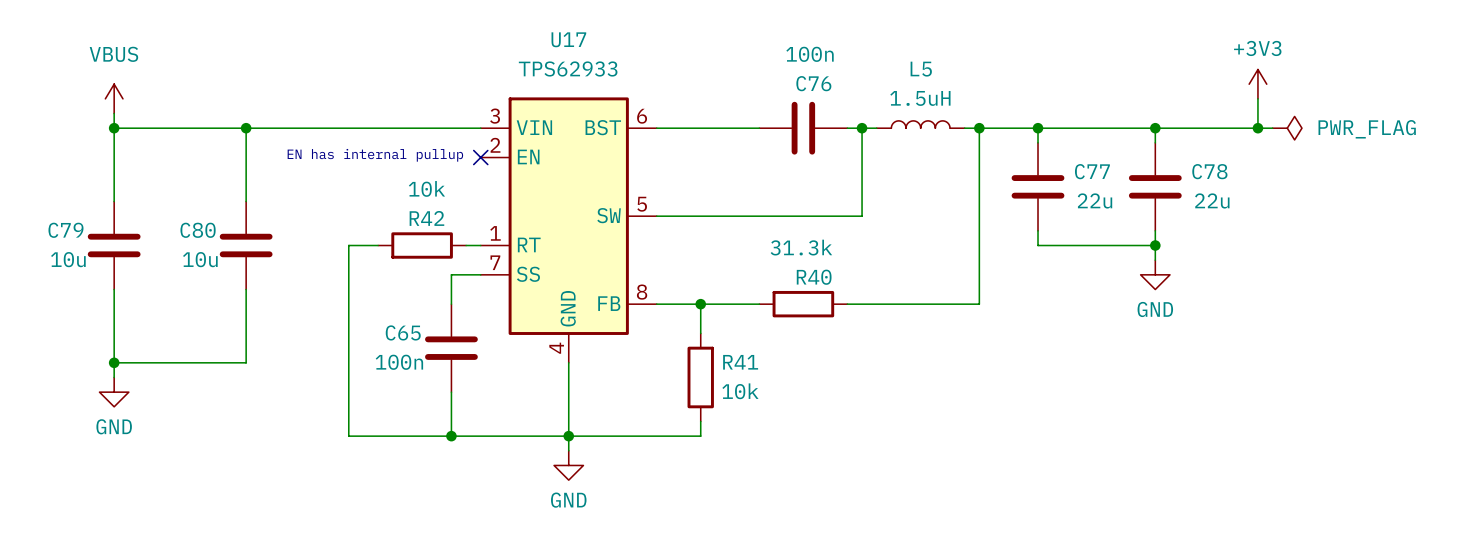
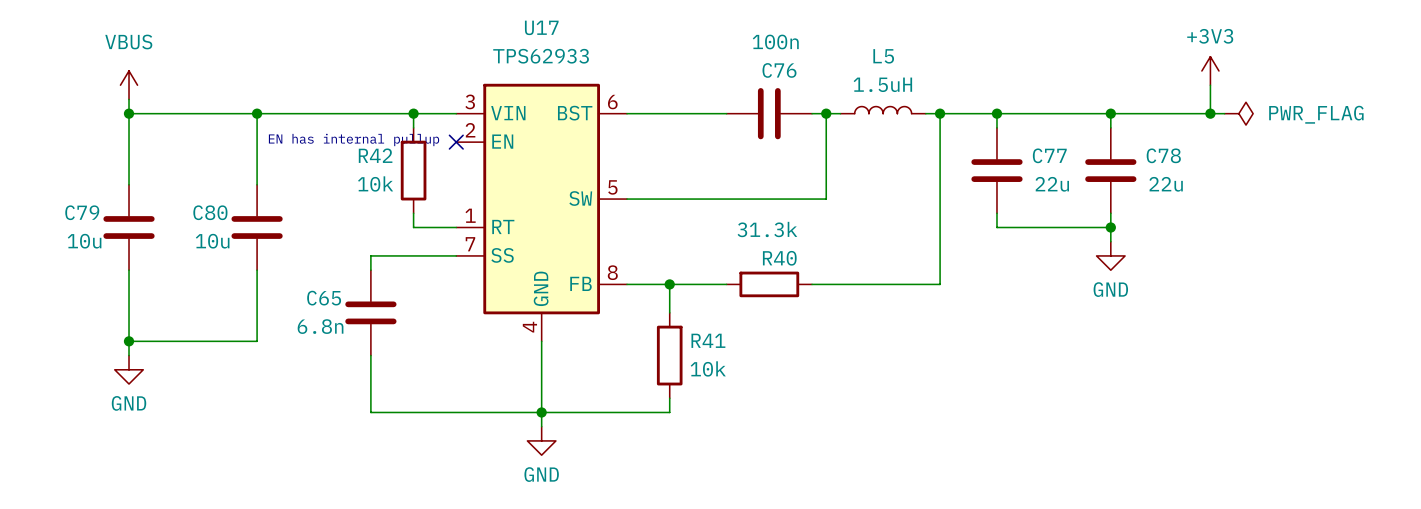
power symbol position: VBUS (114, 98) -> VBUS (129, 85)
wire: (114, 113) (114, 201) -> (129, 99) (129, 184)
wire: (114, 128) (143, 128) -> none
junction position: (114, 128) -> (129, 113)
wire: (246, 128) (246, 201) -> (257, 113) (257, 184)
junction position: (246, 128) -> (257, 113)
wire: none -> (413, 113) (413, 127)
junction: none -> (413, 113)
R42 value position: 10k (426, 188) -> 10k (375, 183)
R42 name position: R42 (426, 218) -> R42 (375, 155)
wire: none -> (413, 213) (413, 227) (442, 227)
C79 position: (114, 245) -> (129, 227)
C80 position: (246, 245) -> (257, 227)
wire: (378, 245) (348, 245) (348, 436) (392, 436) -> (370, 355) (370, 412)
R42 rotation: 0° (422, 245) -> 90° clockwise (413, 170)
R42 position: (422, 245) -> (413, 170)
wire: (451, 274) (451, 304) -> (427, 255) (370, 255) (370, 270)
wire: (114, 289) (114, 377) -> (129, 270) (129, 355)
wire: (246, 289) (246, 362) -> (257, 270) (257, 341) (228, 341)
C65 position: (451, 348) -> (370, 312)
wire: (114, 362) (143, 362) -> none
junction position: (114, 362) -> (129, 341)
C65 value: 100n (399, 362) -> 6.8n (320, 326)
power symbol position: GND (114, 392) -> GND (129, 369)
wire: (451, 392) (451, 436) -> none
junction: (451, 436) -> none

